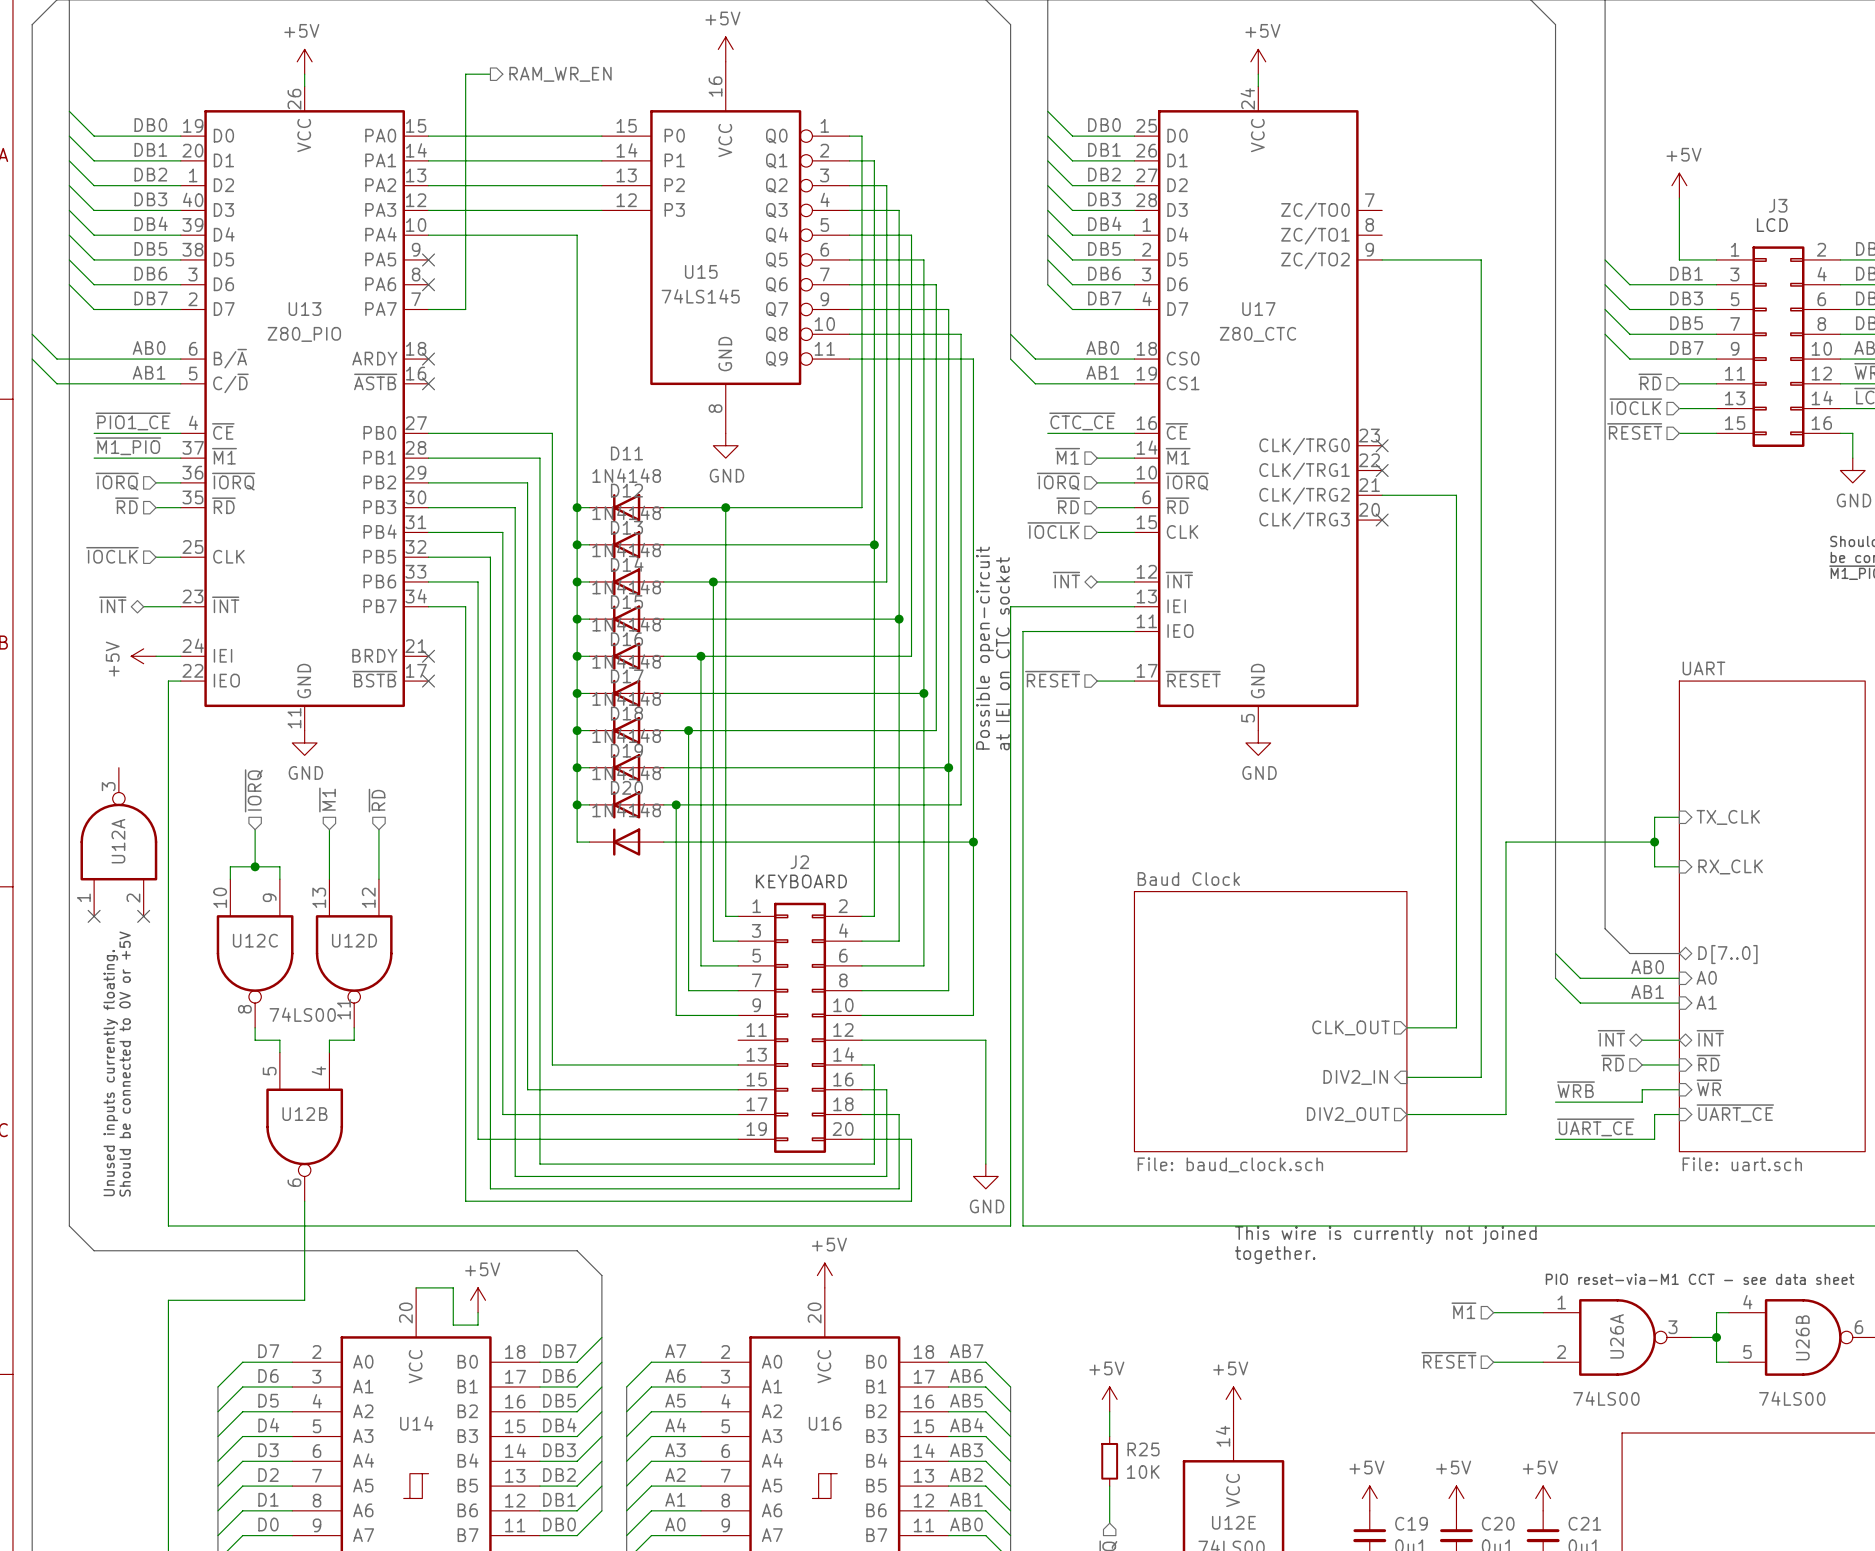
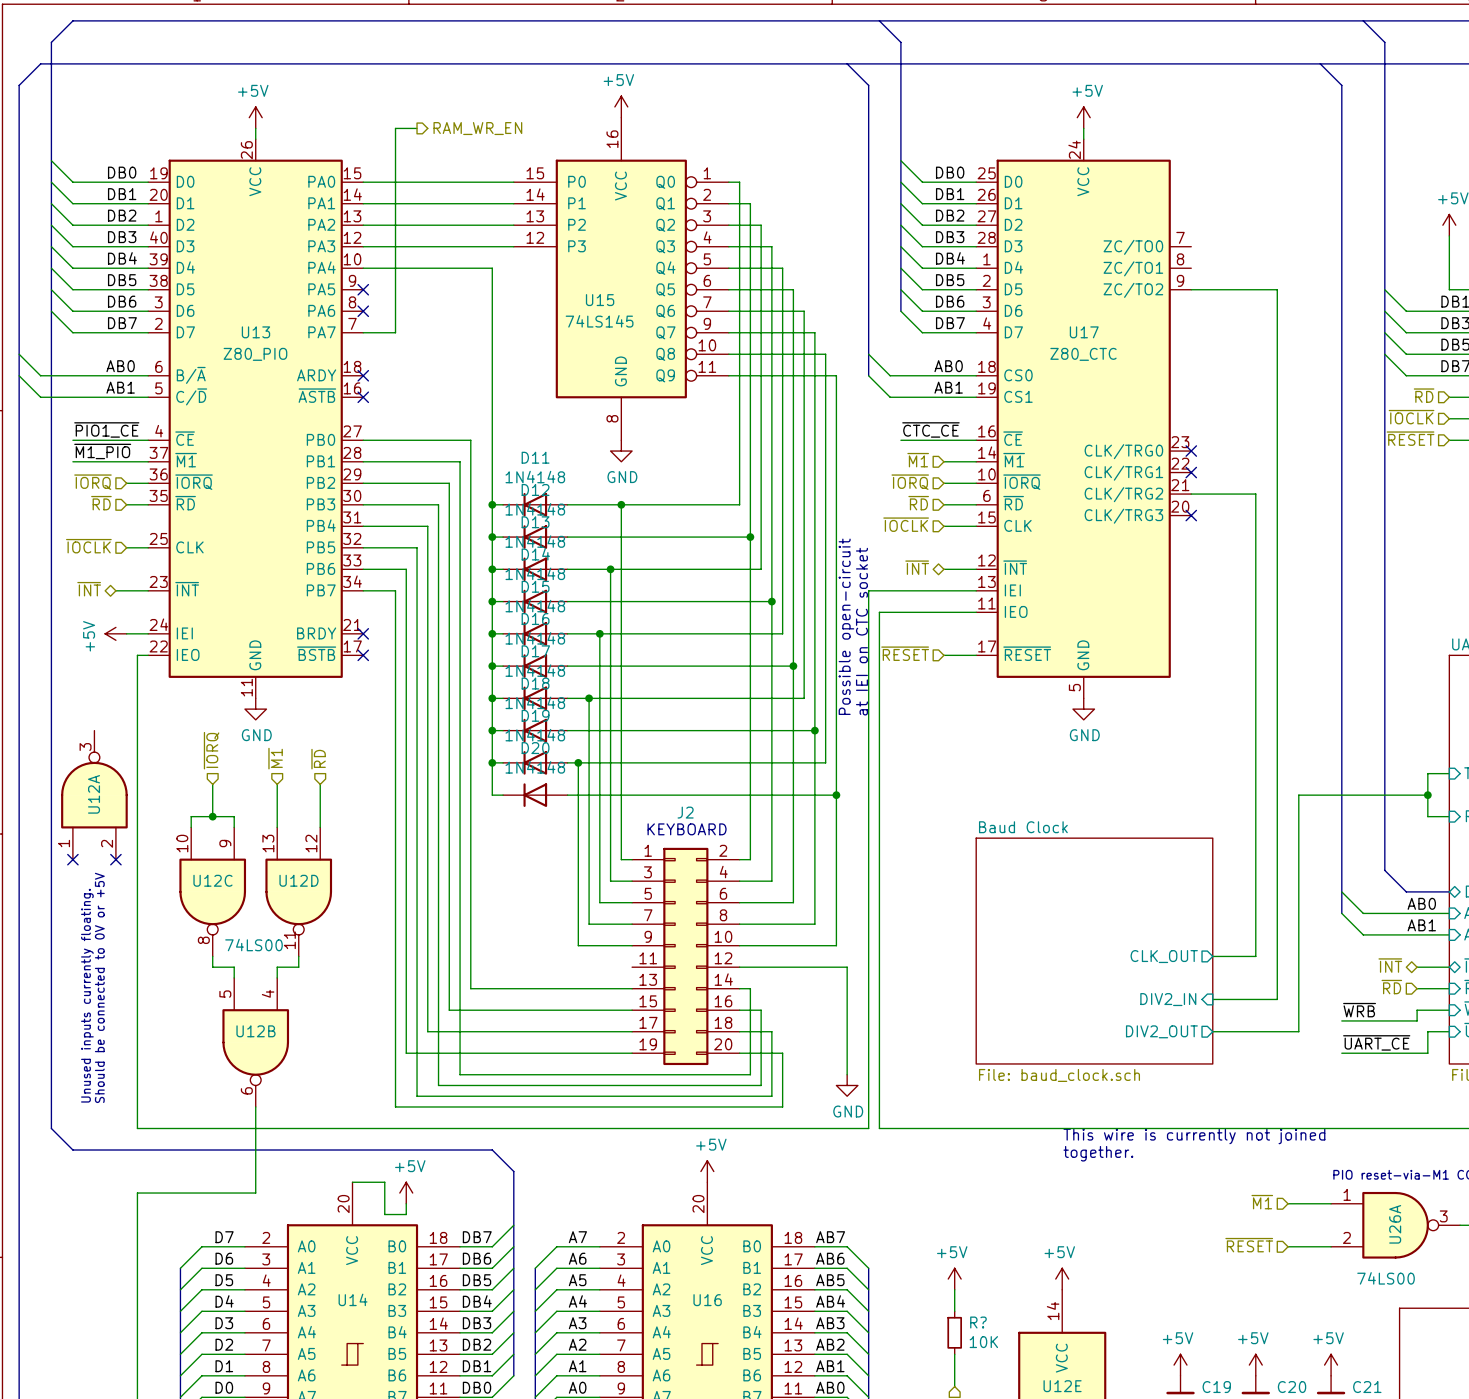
R25 name: R25 (1143, 1449) -> R? (978, 1322)

